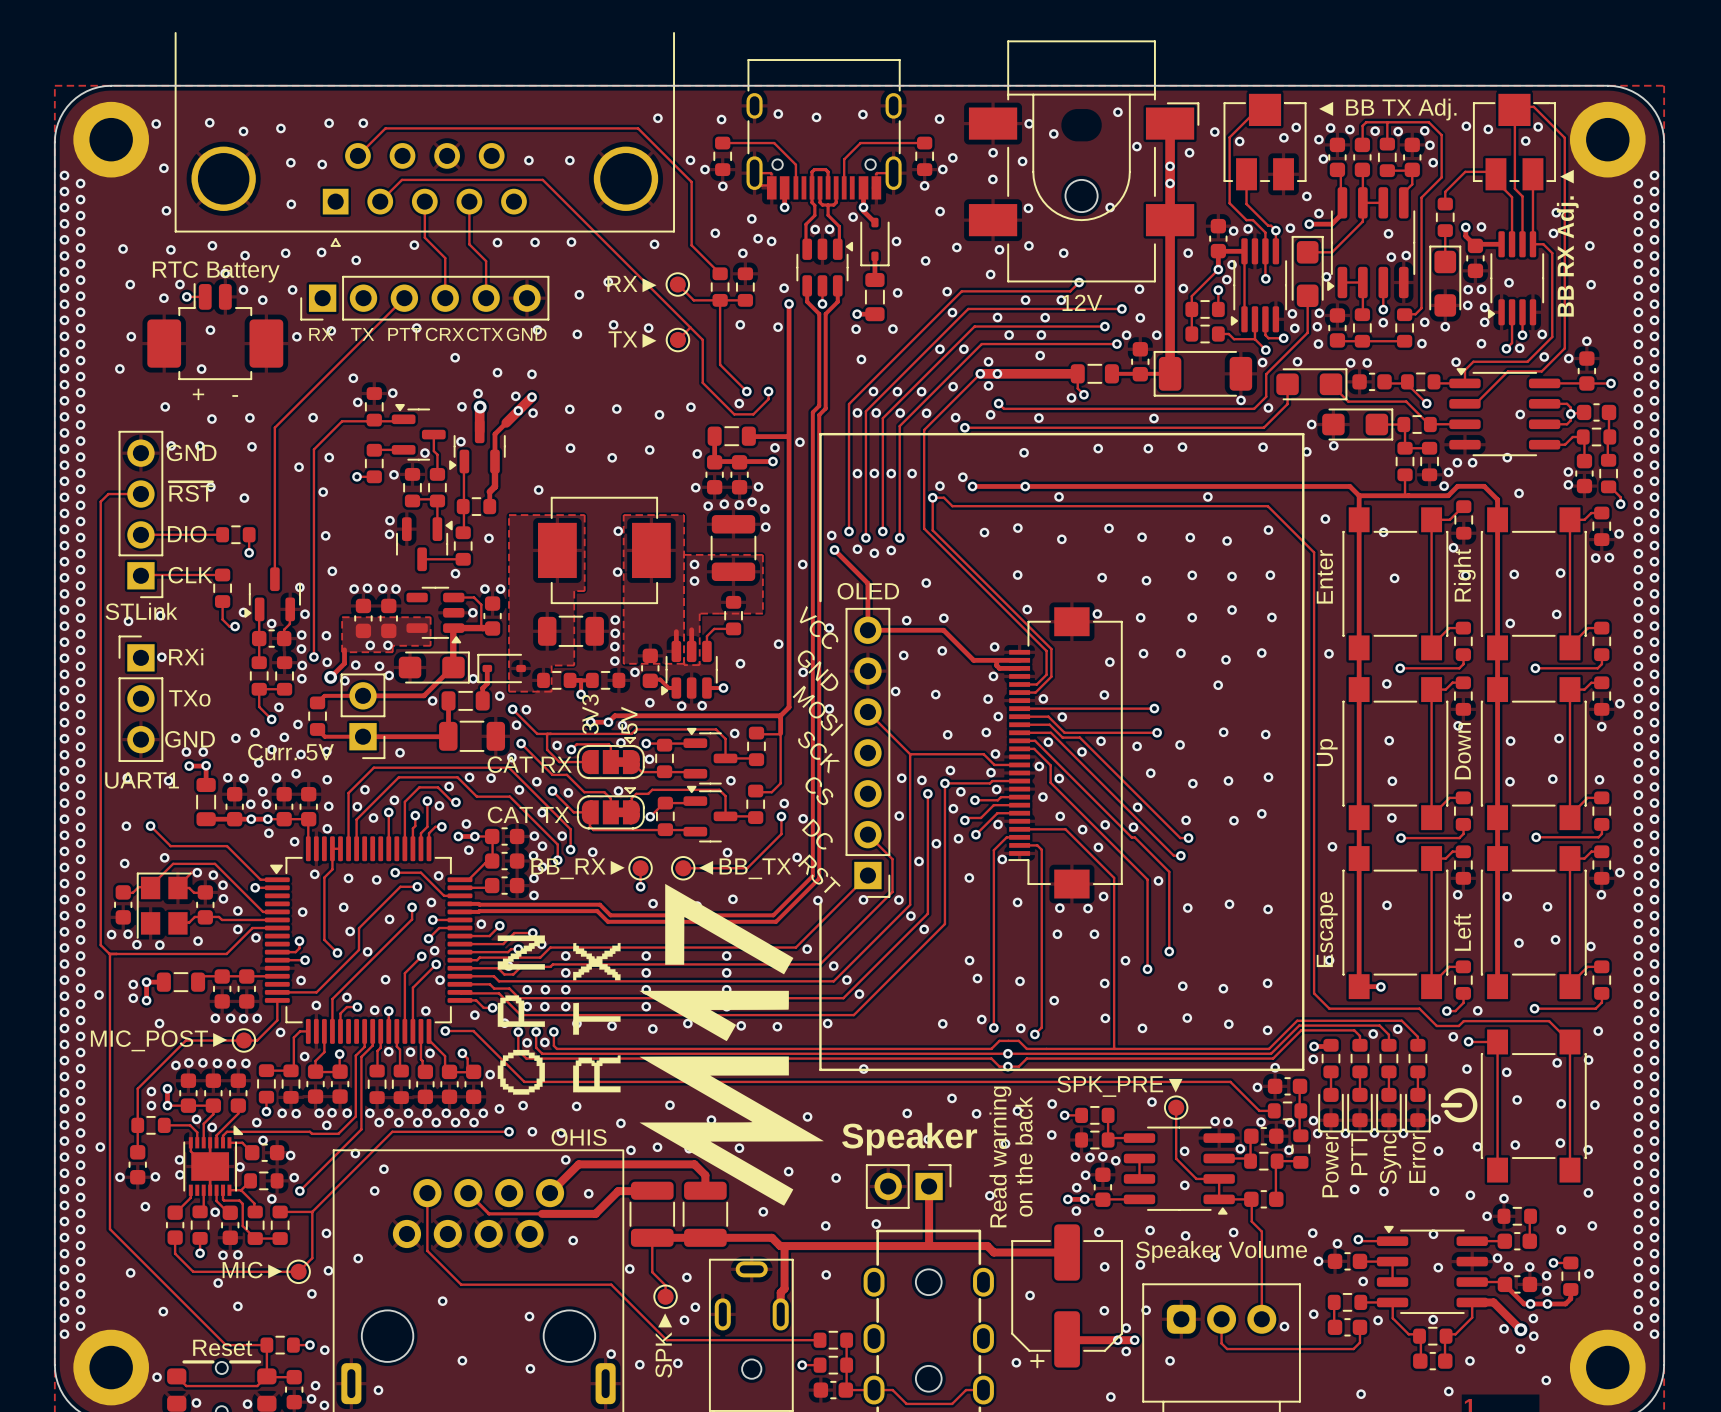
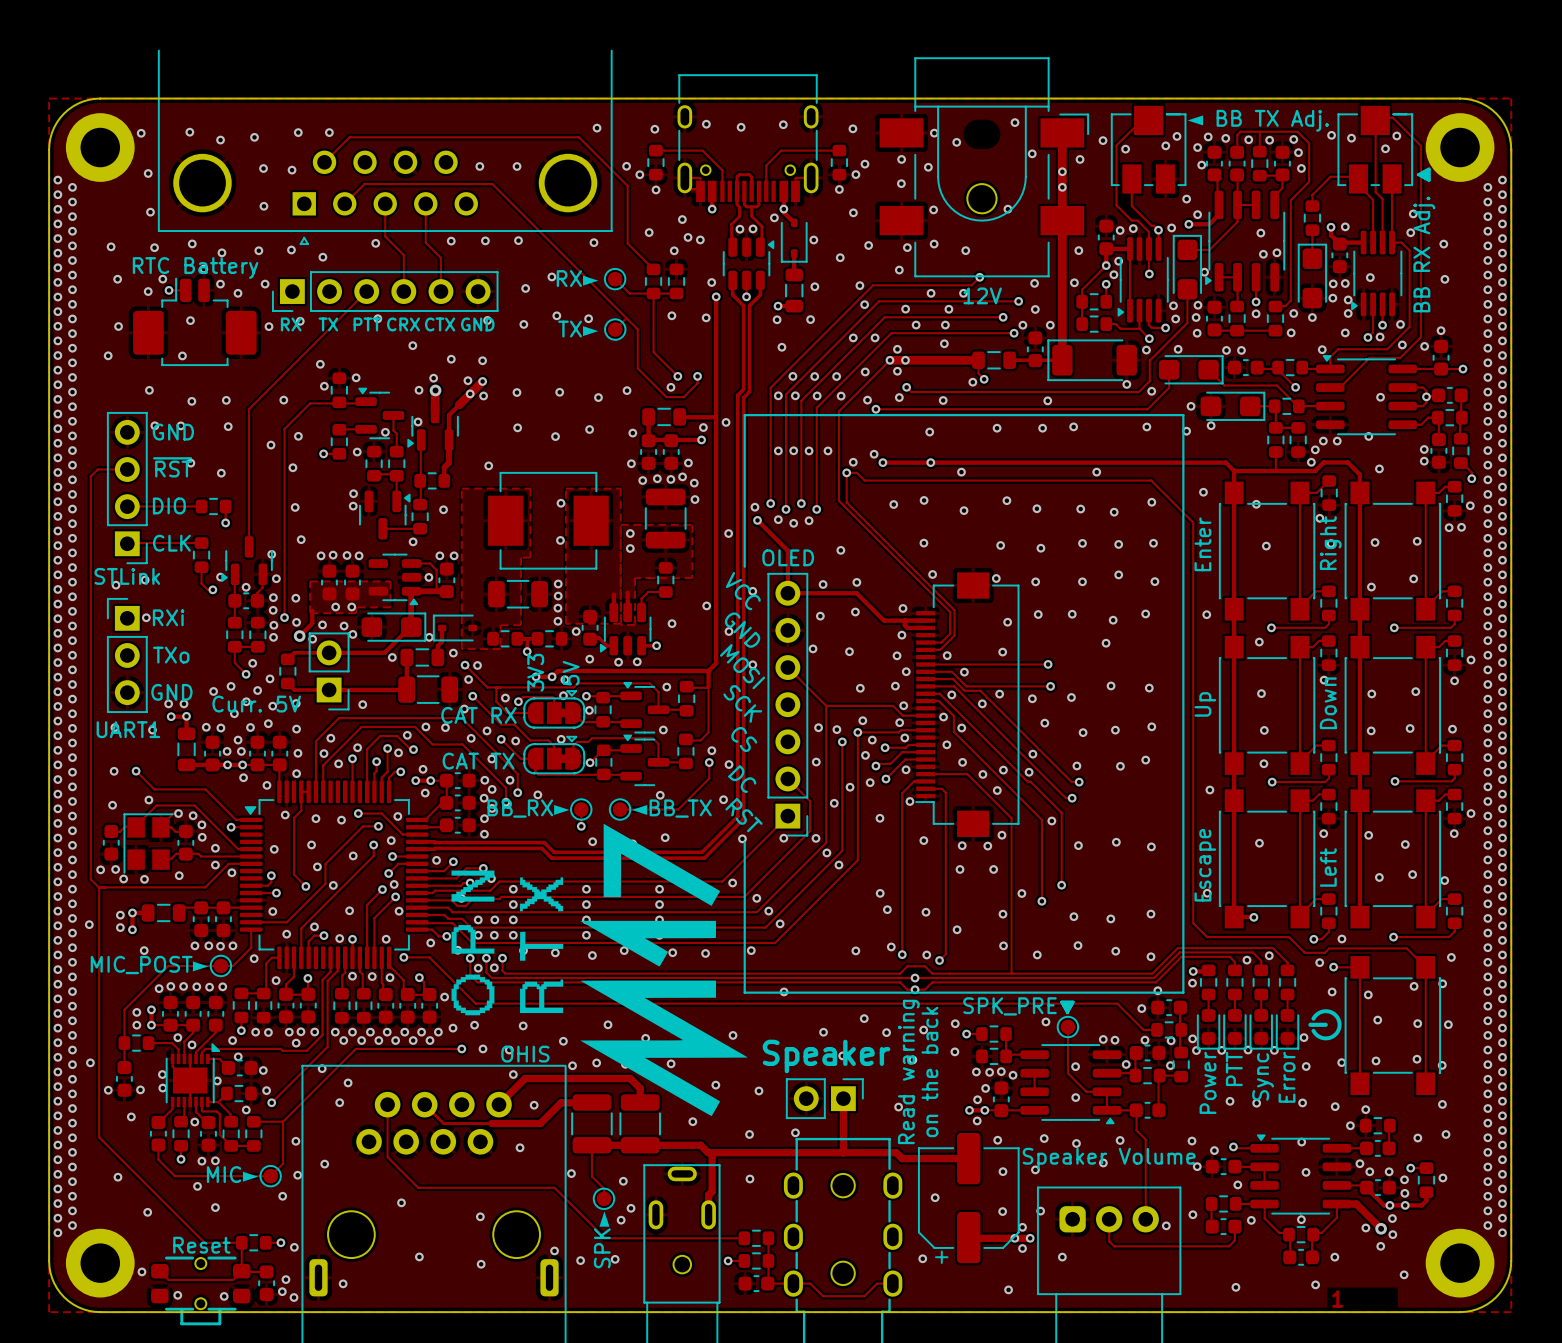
text: + - (215, 394) -> none

